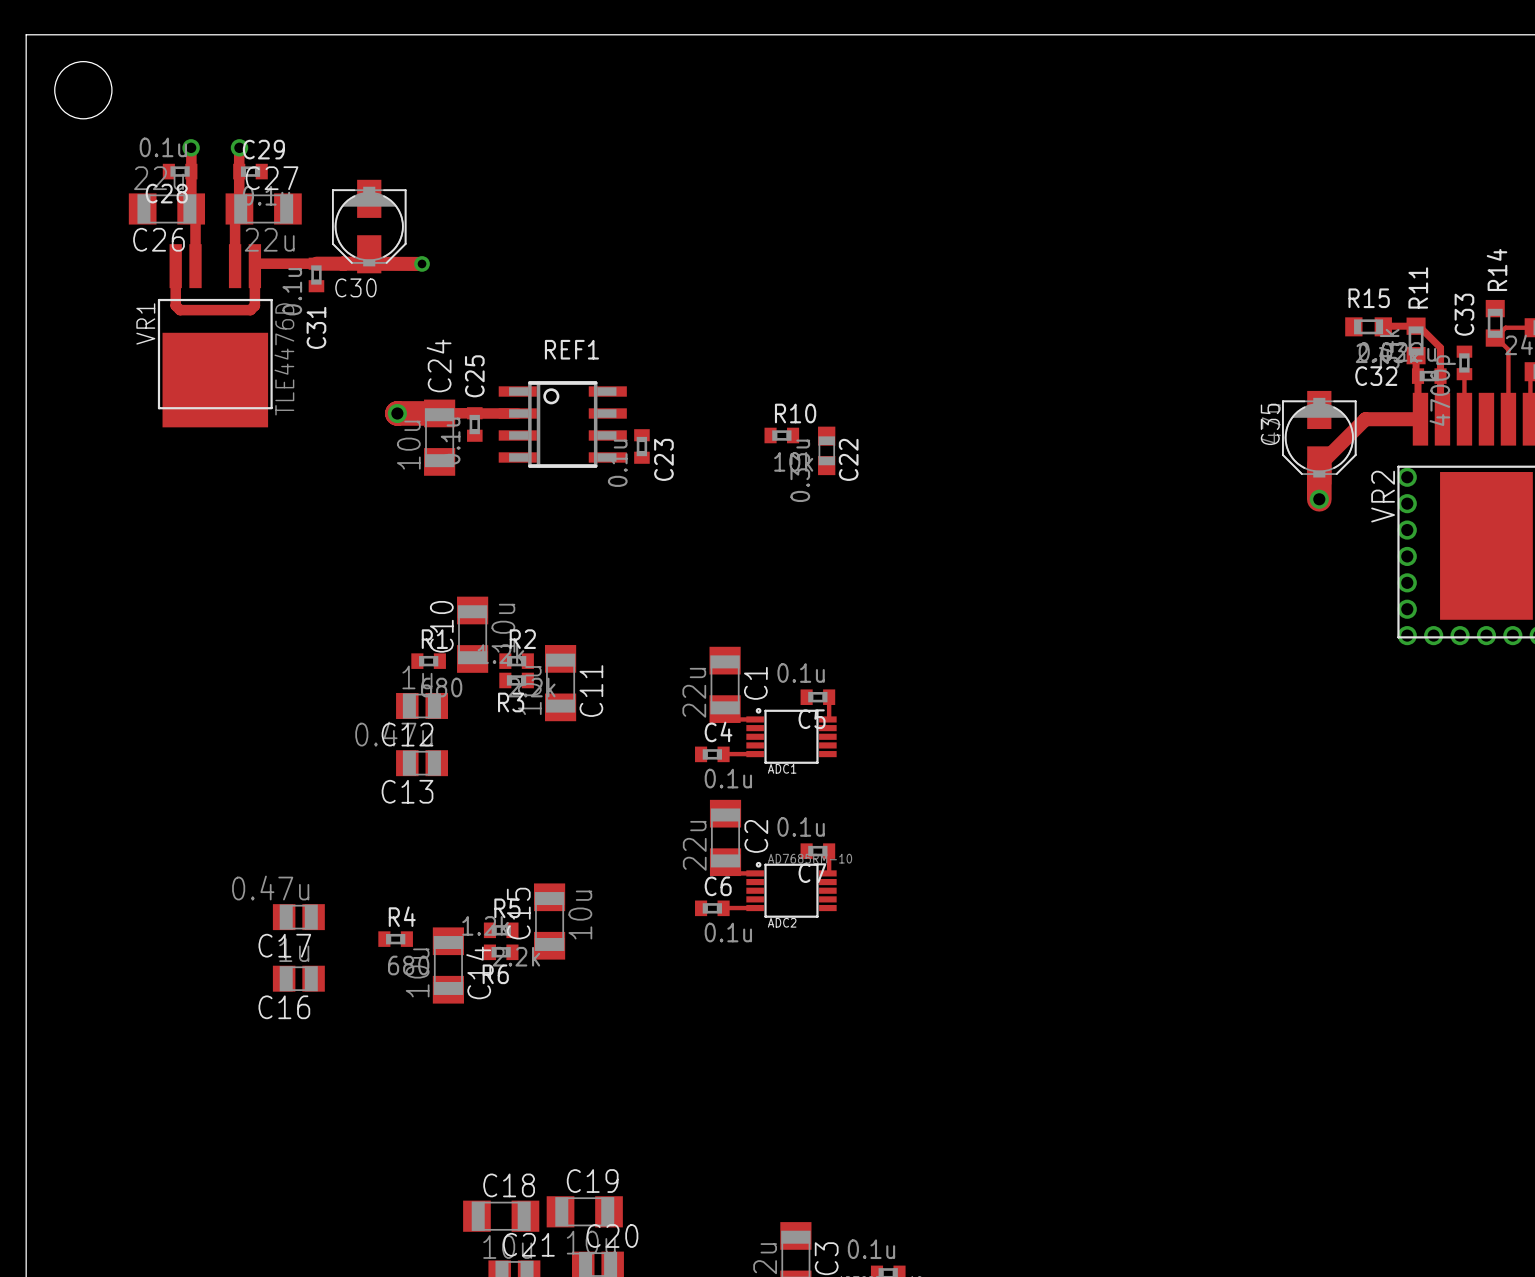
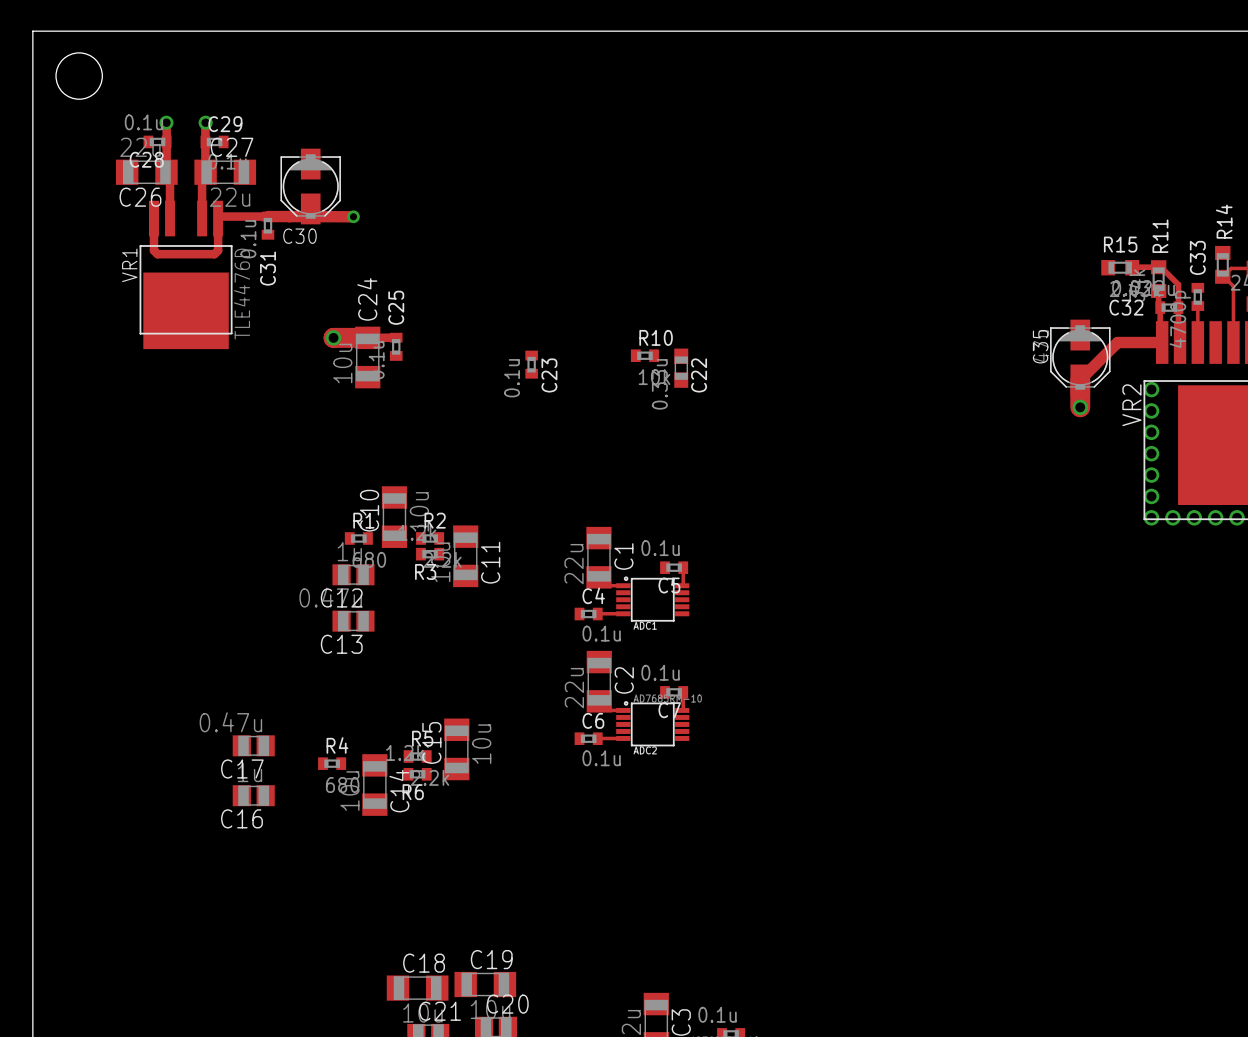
track: (475, 413) (517, 413) -> none
REF1: (562, 424) -> none

